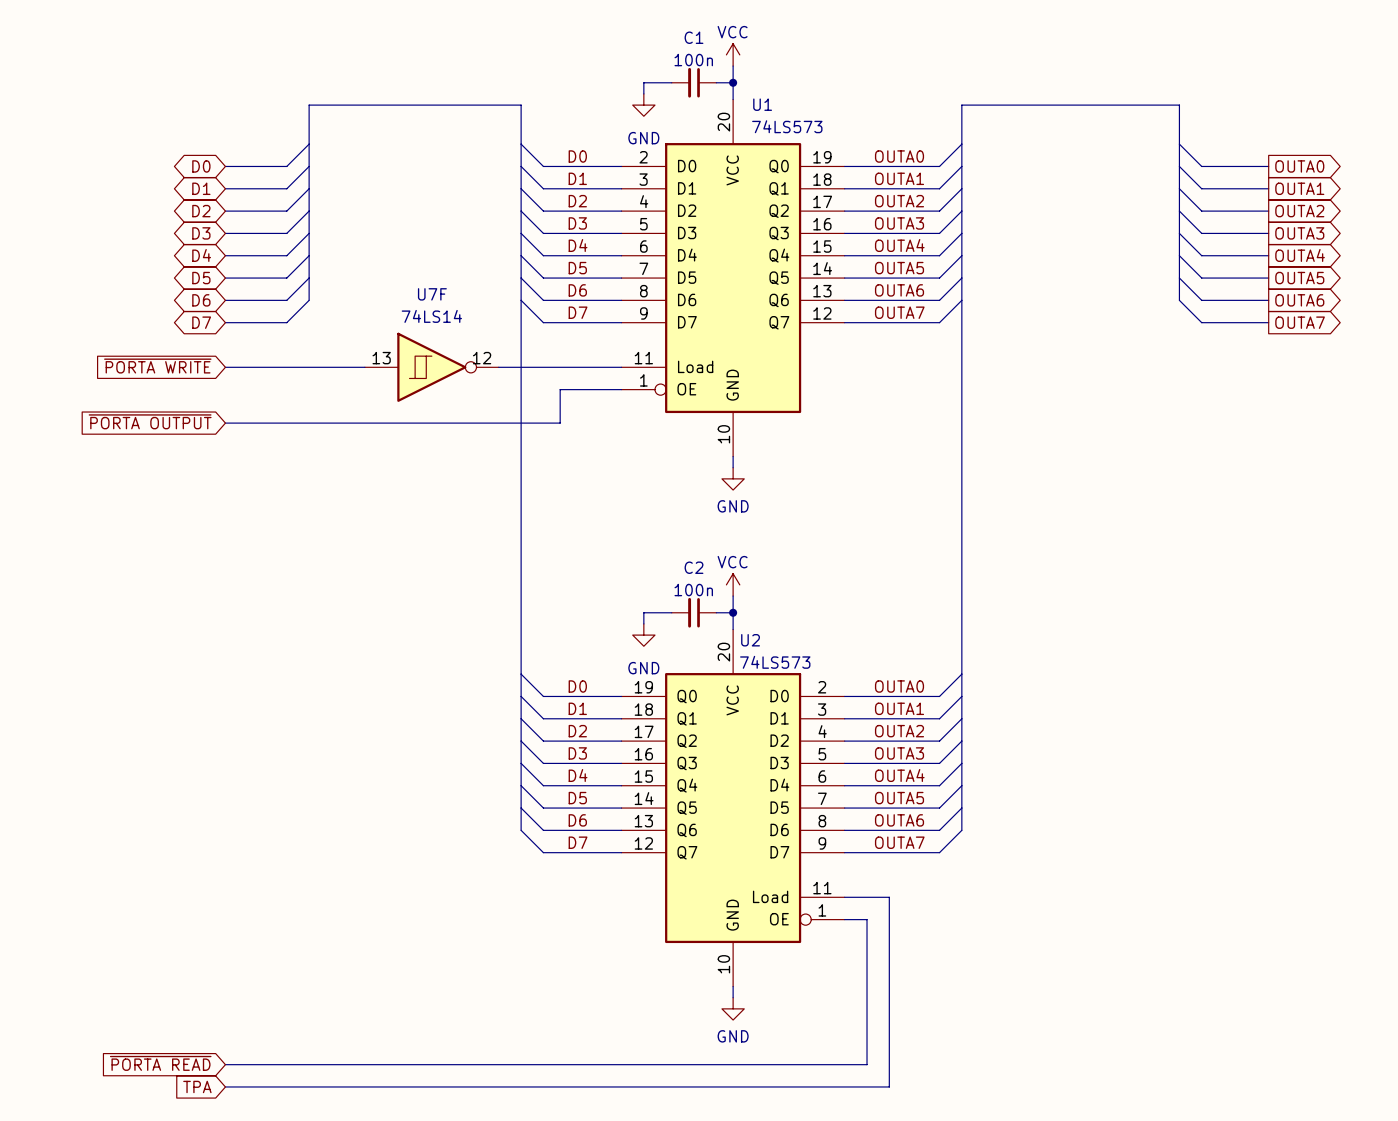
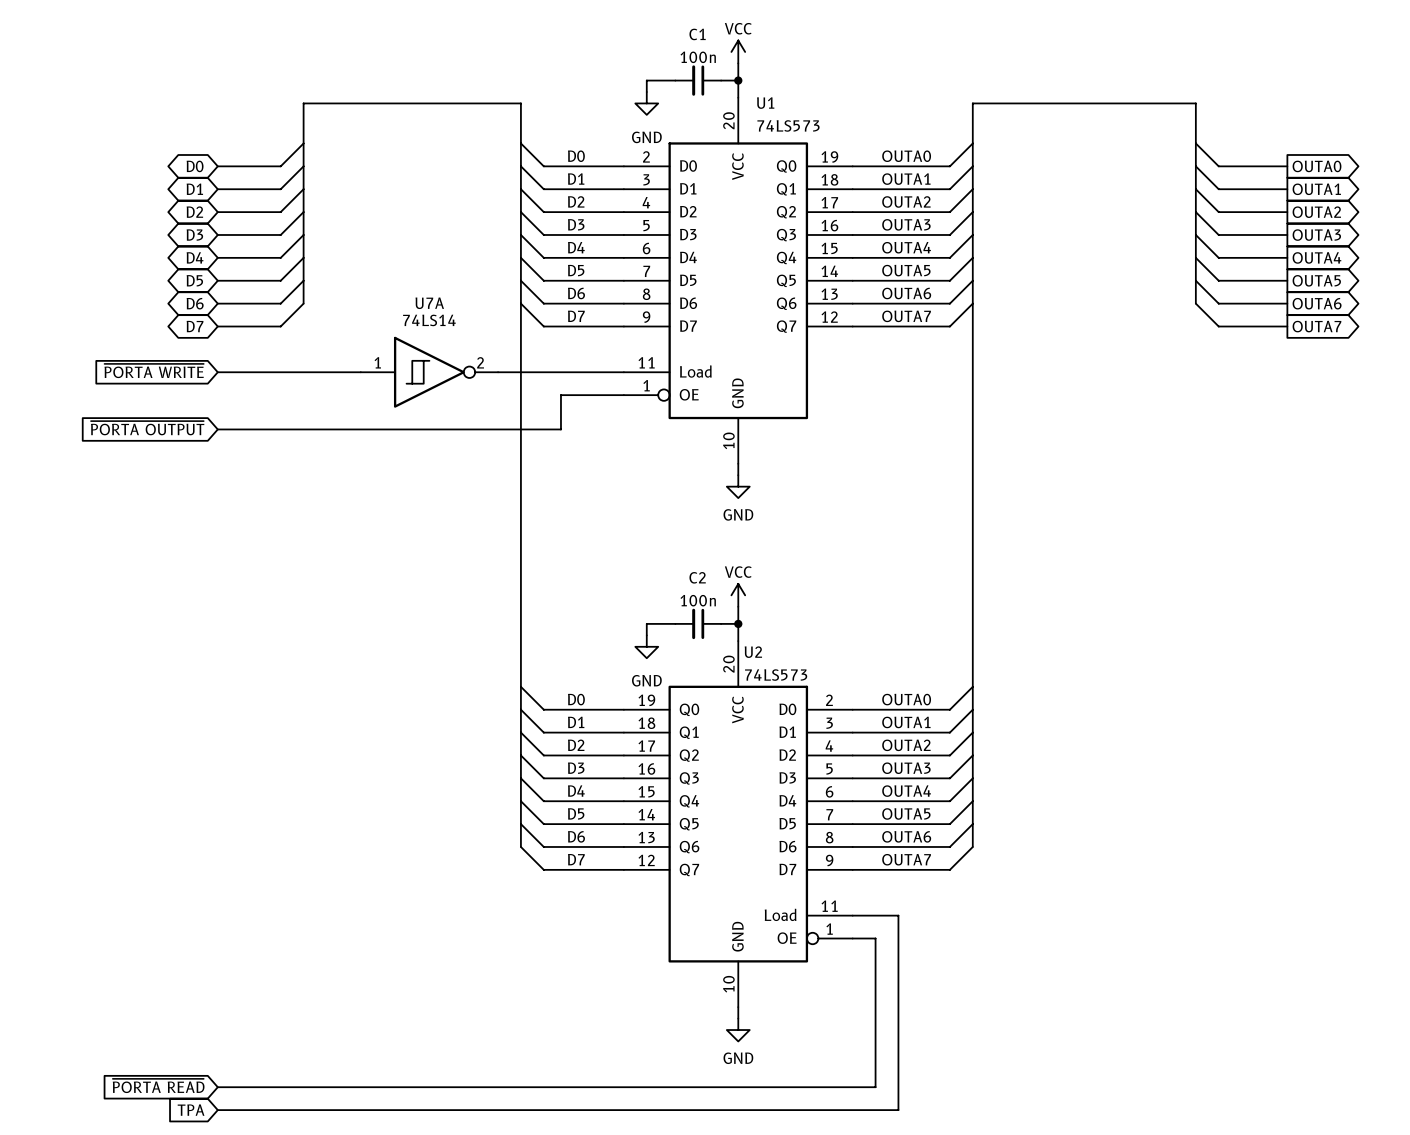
U7F name: U7F (432, 294) -> U7A (429, 303)
U7F pin number: 13 (381, 358) -> 1 (377, 362)
U7F pin number: 12 (482, 358) -> 2 (480, 362)

